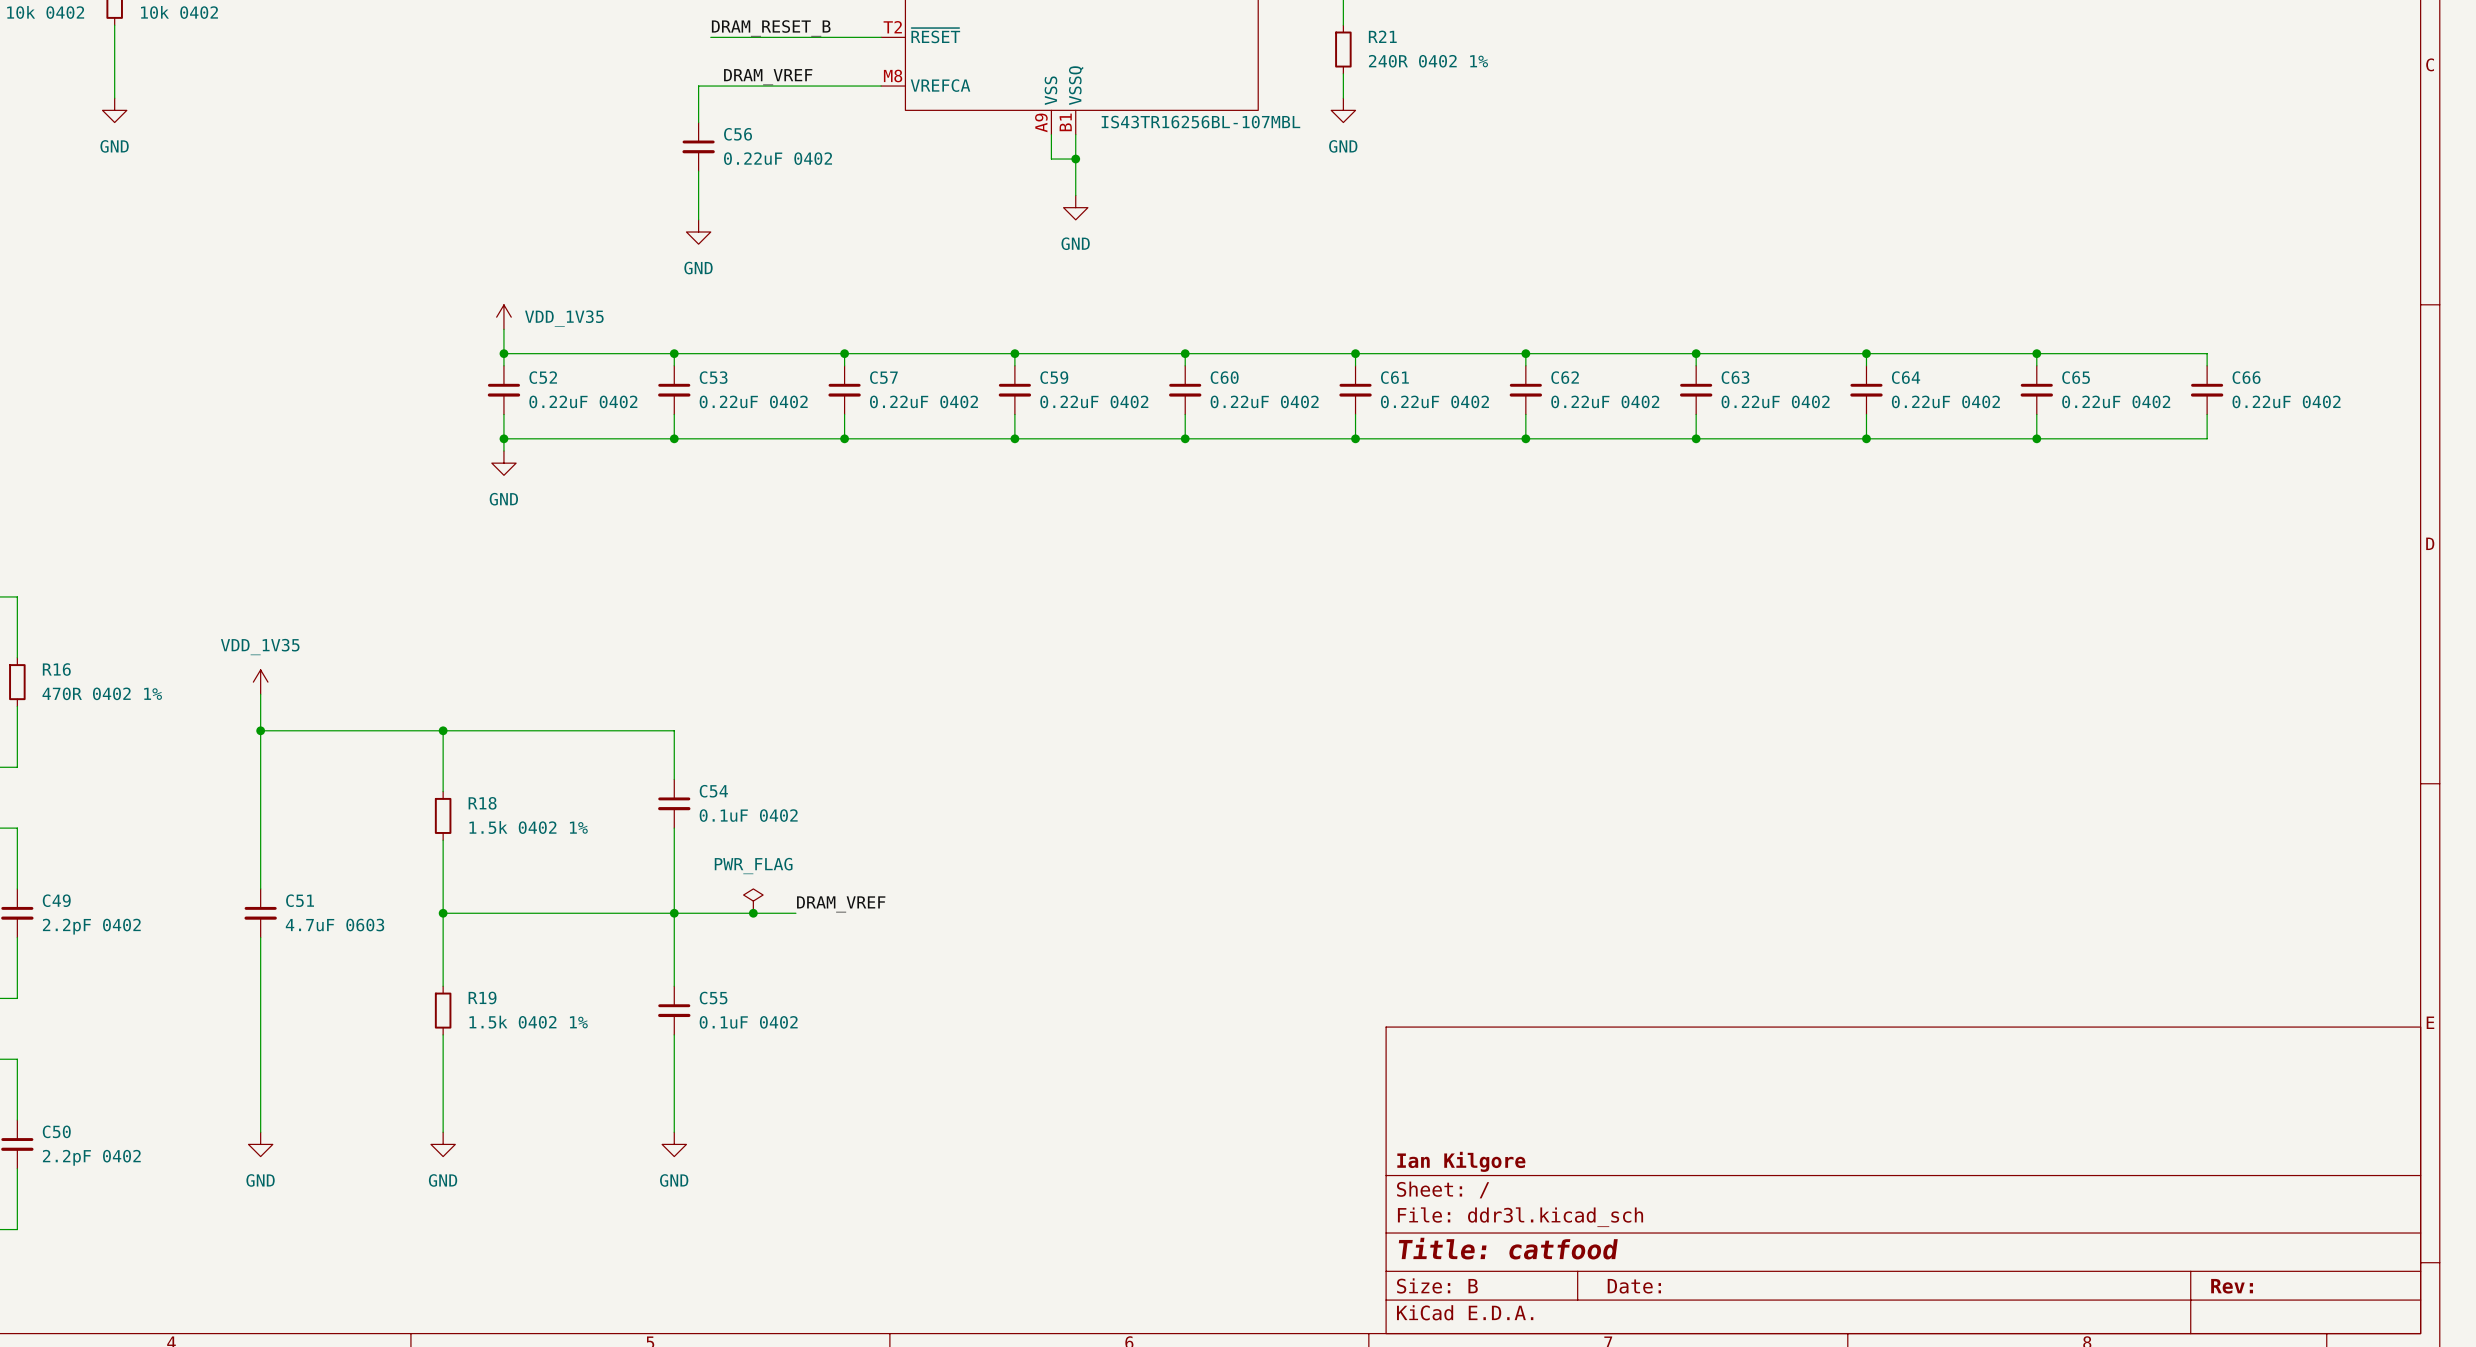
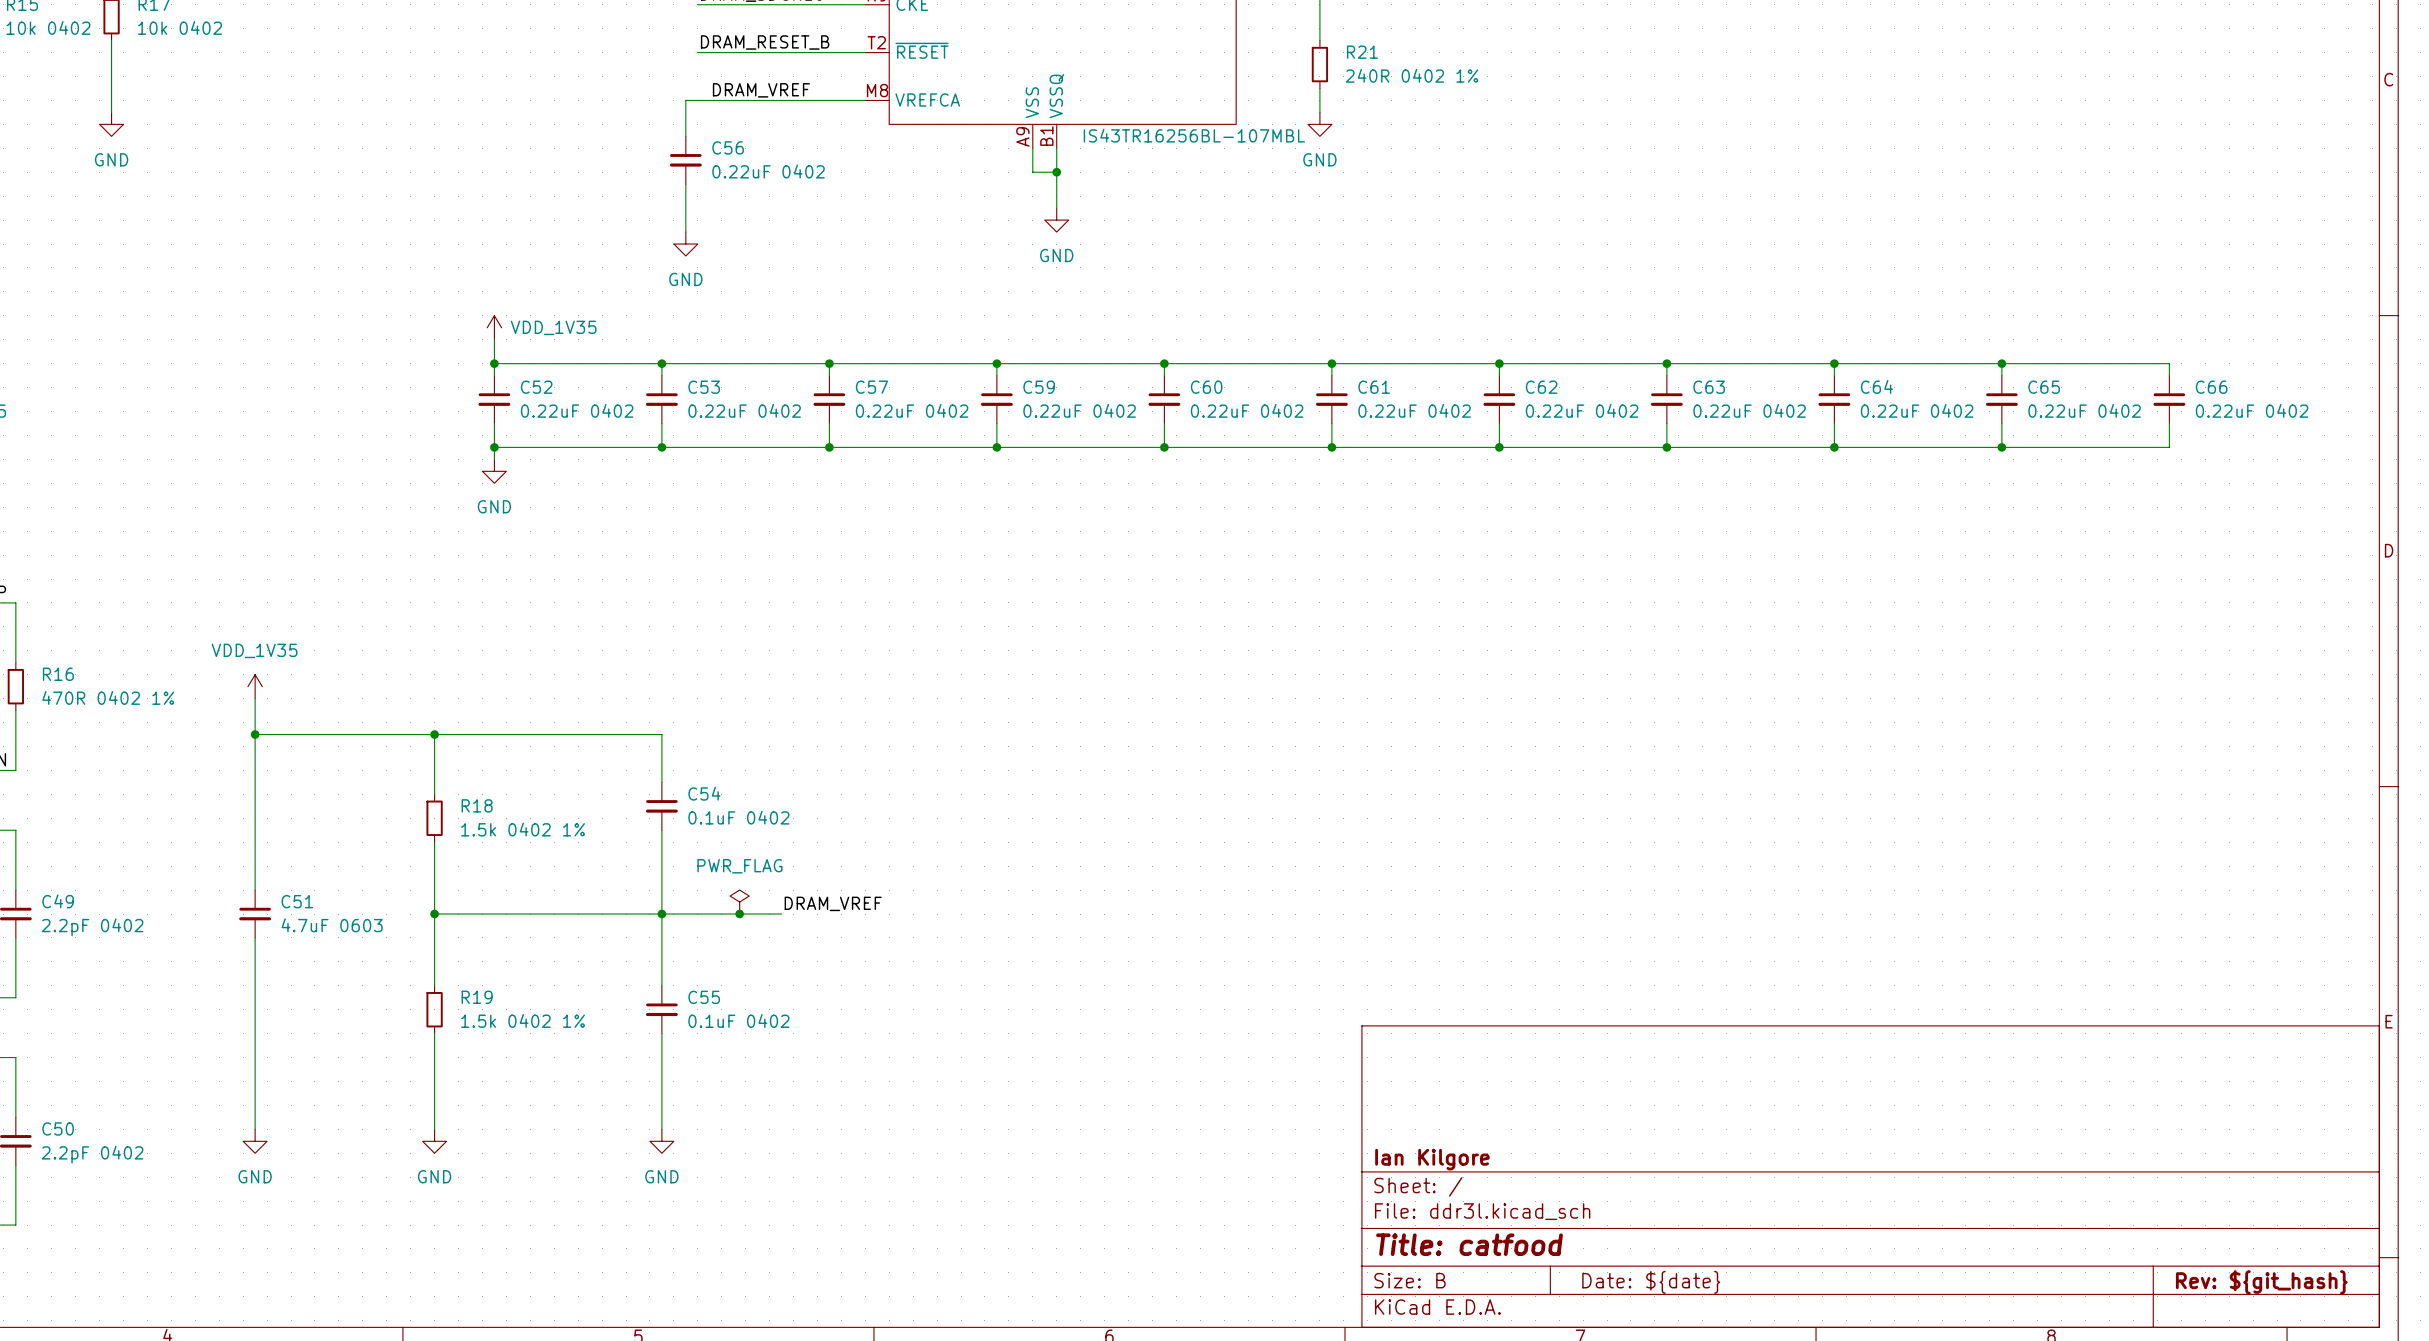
title block: Date: (1634, 1286) -> Date: ${date} (1651, 1282)
title block: Rev: (2232, 1286) -> Rev: ${git_hash} (2261, 1282)

